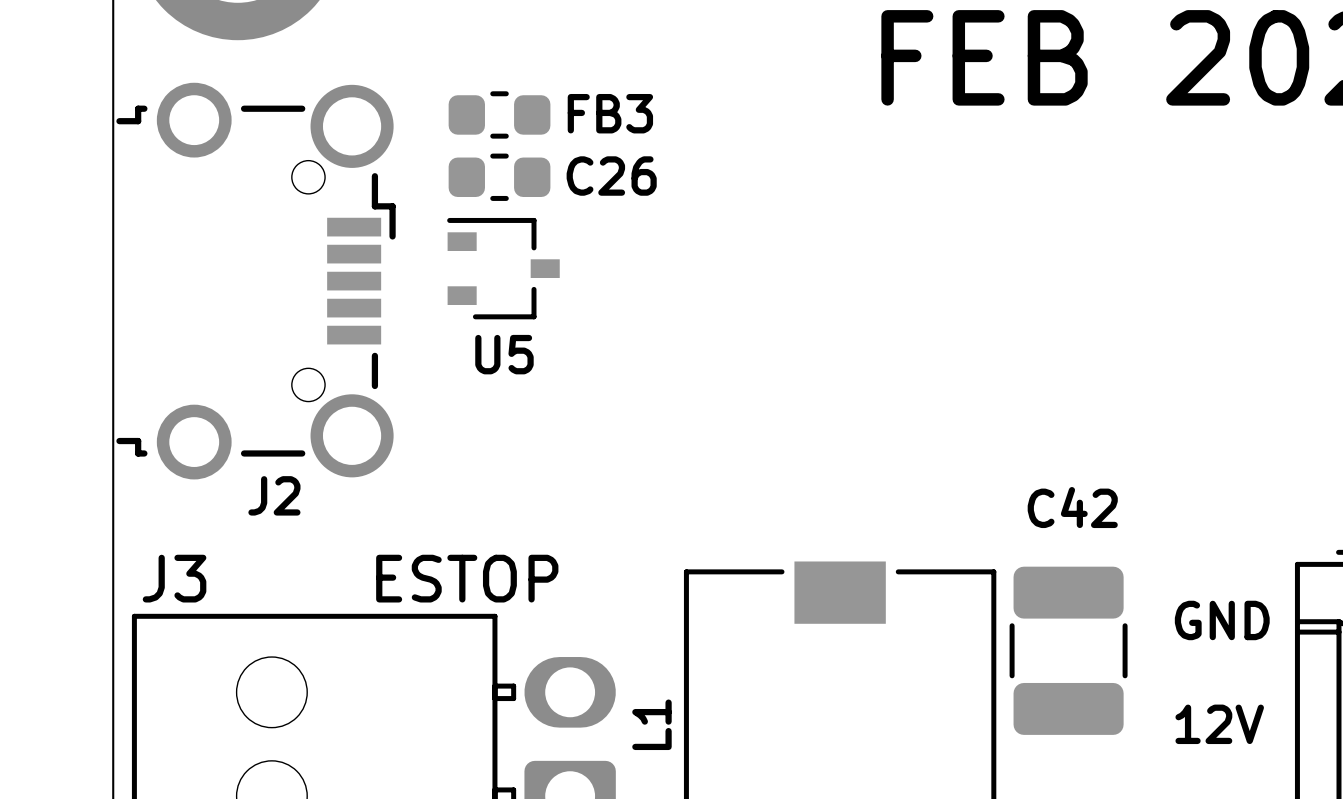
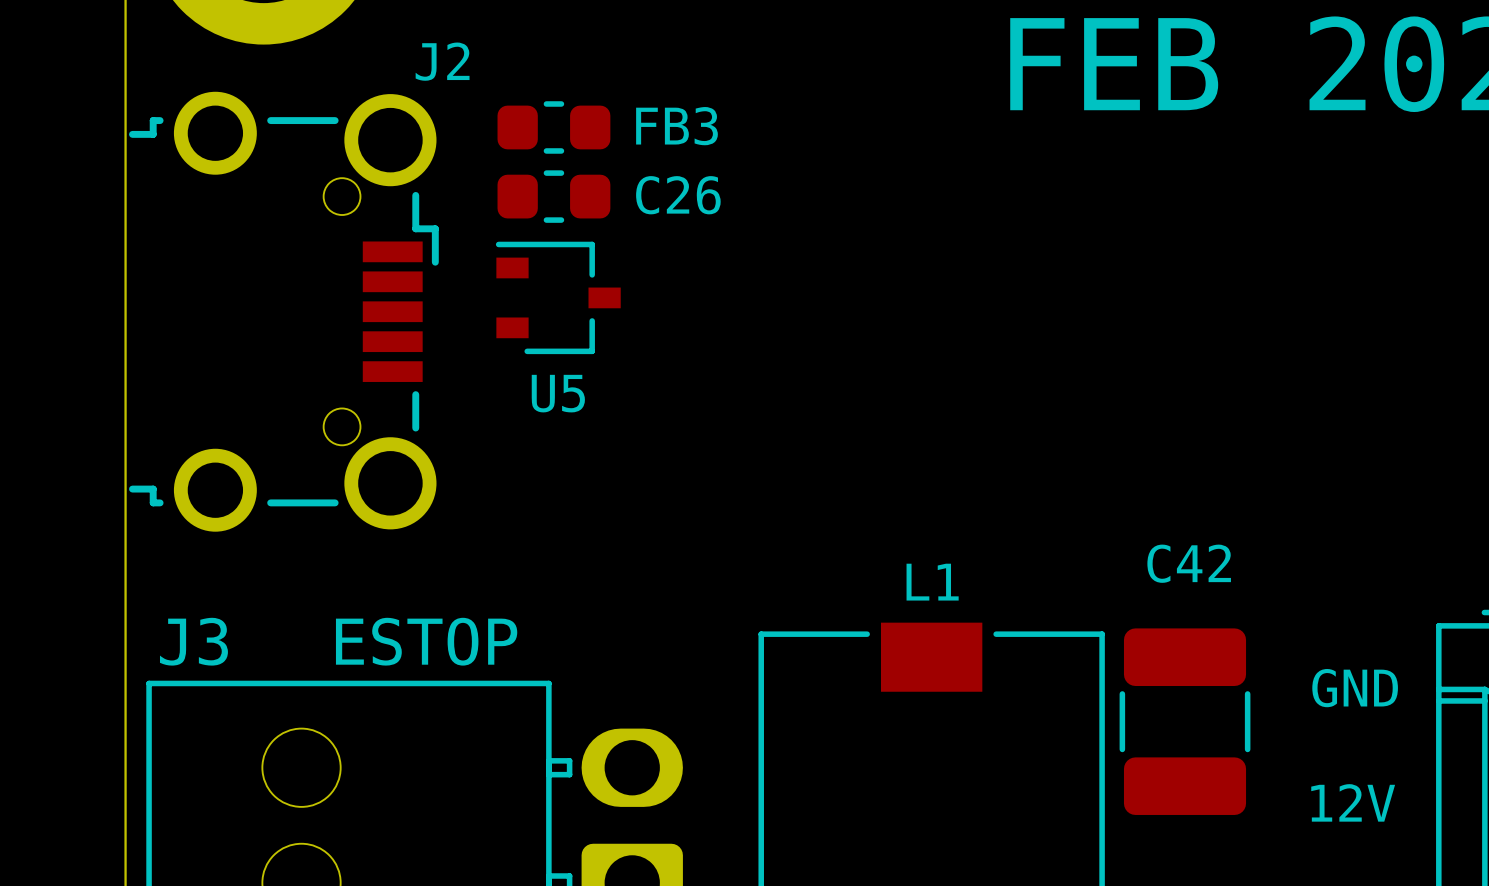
J2 name position: J2 (274, 495) -> J2 (442, 61)
J3 value position: ESTOP (467, 578) -> ESTOP (426, 641)
L1 name rotation: 0° (651, 724) -> 90° clockwise (932, 582)
L1 name position: L1 (651, 724) -> L1 (932, 582)

